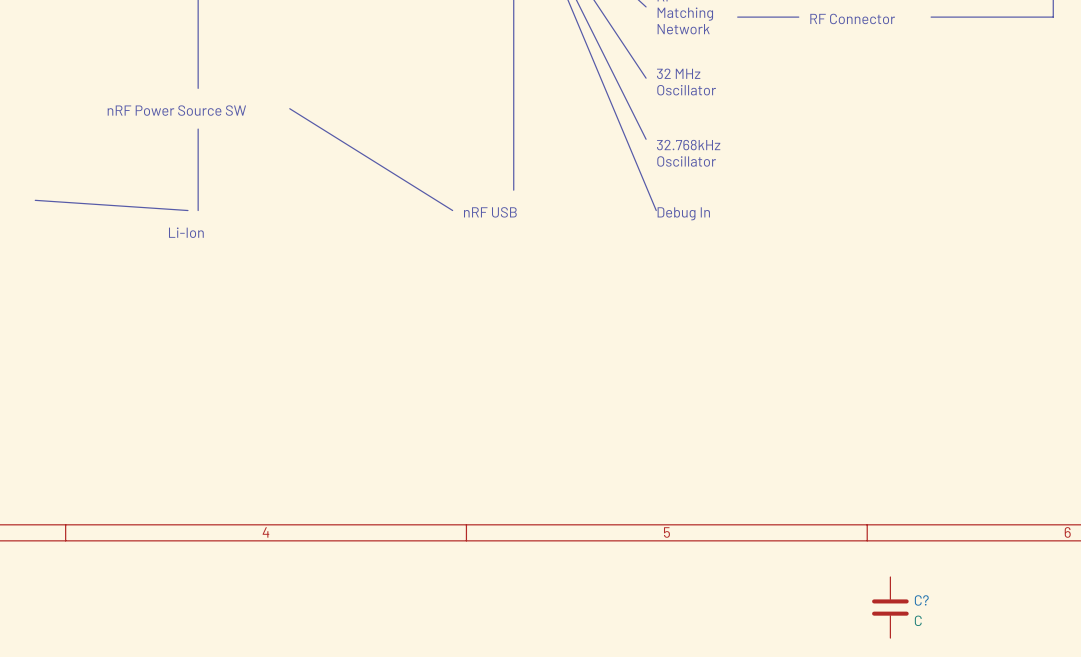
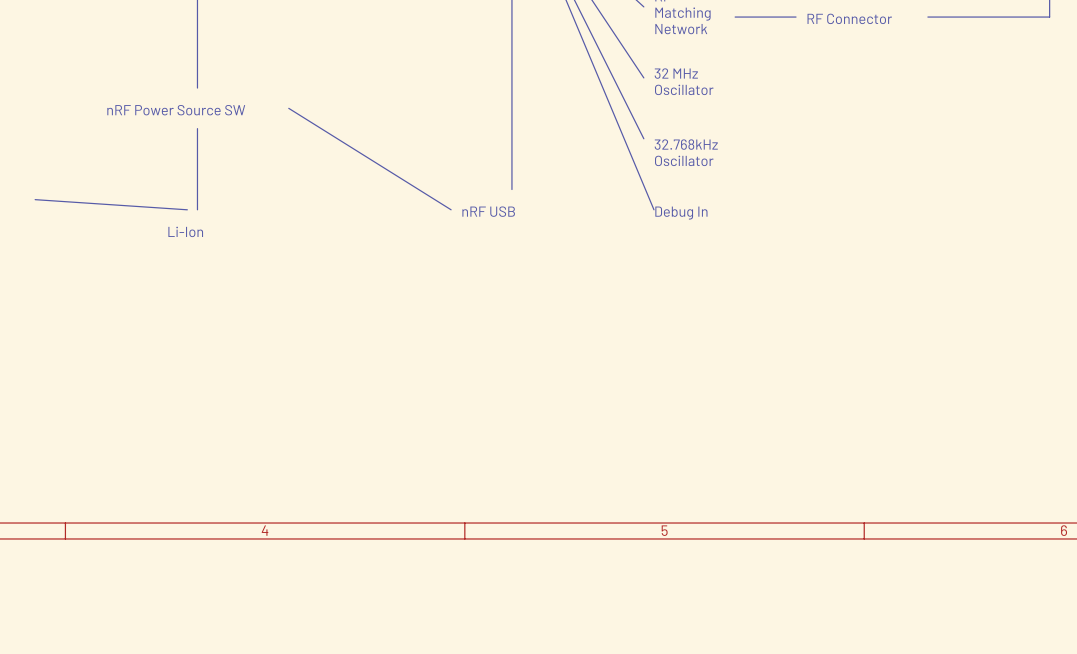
C?: C (890, 607) -> none

